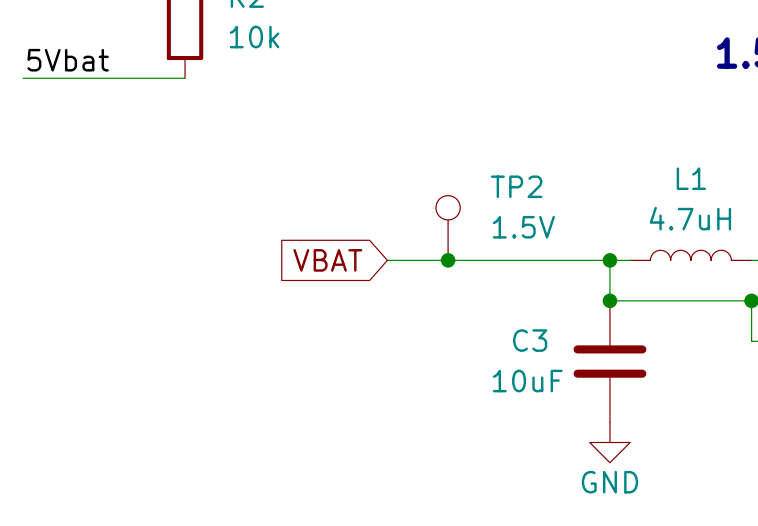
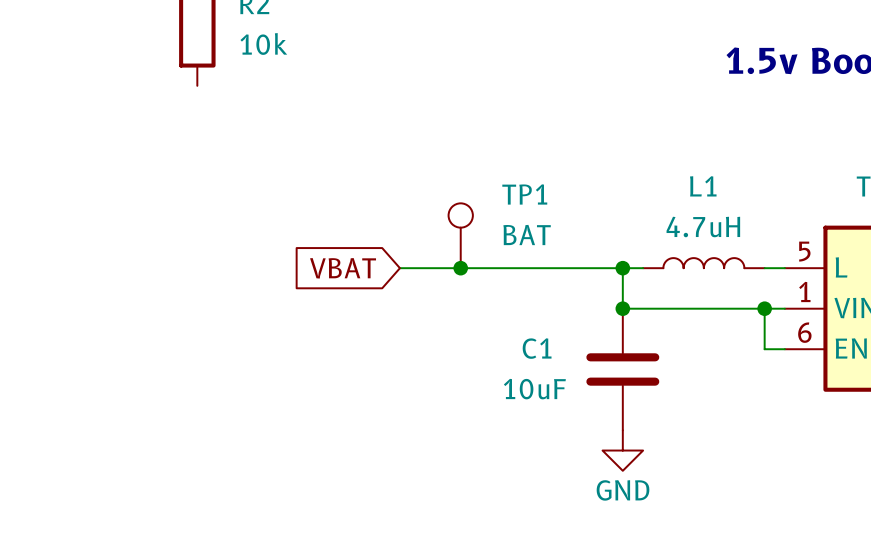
label: 5Vbat (68, 60) -> none
wire: (23, 78) (185, 78) -> none
TP2 name: TP2 (516, 186) -> TP1 (524, 194)
TP2 value: 1.5V (523, 227) -> BAT (527, 235)
C3 name: C3 (530, 340) -> C1 (537, 348)

